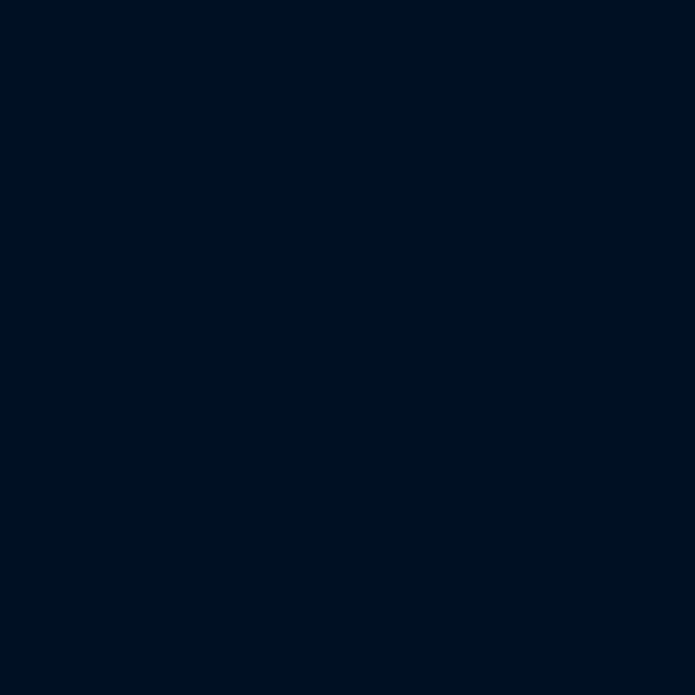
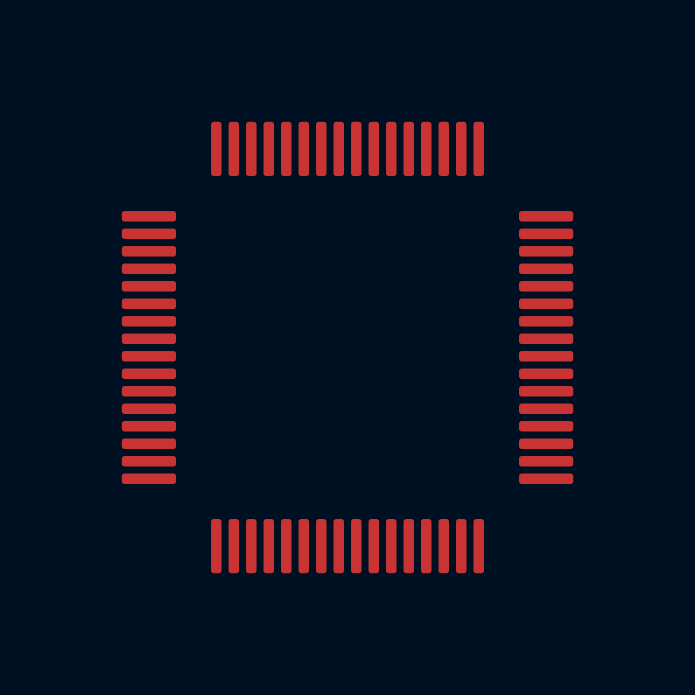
part: none -> (347, 347)

